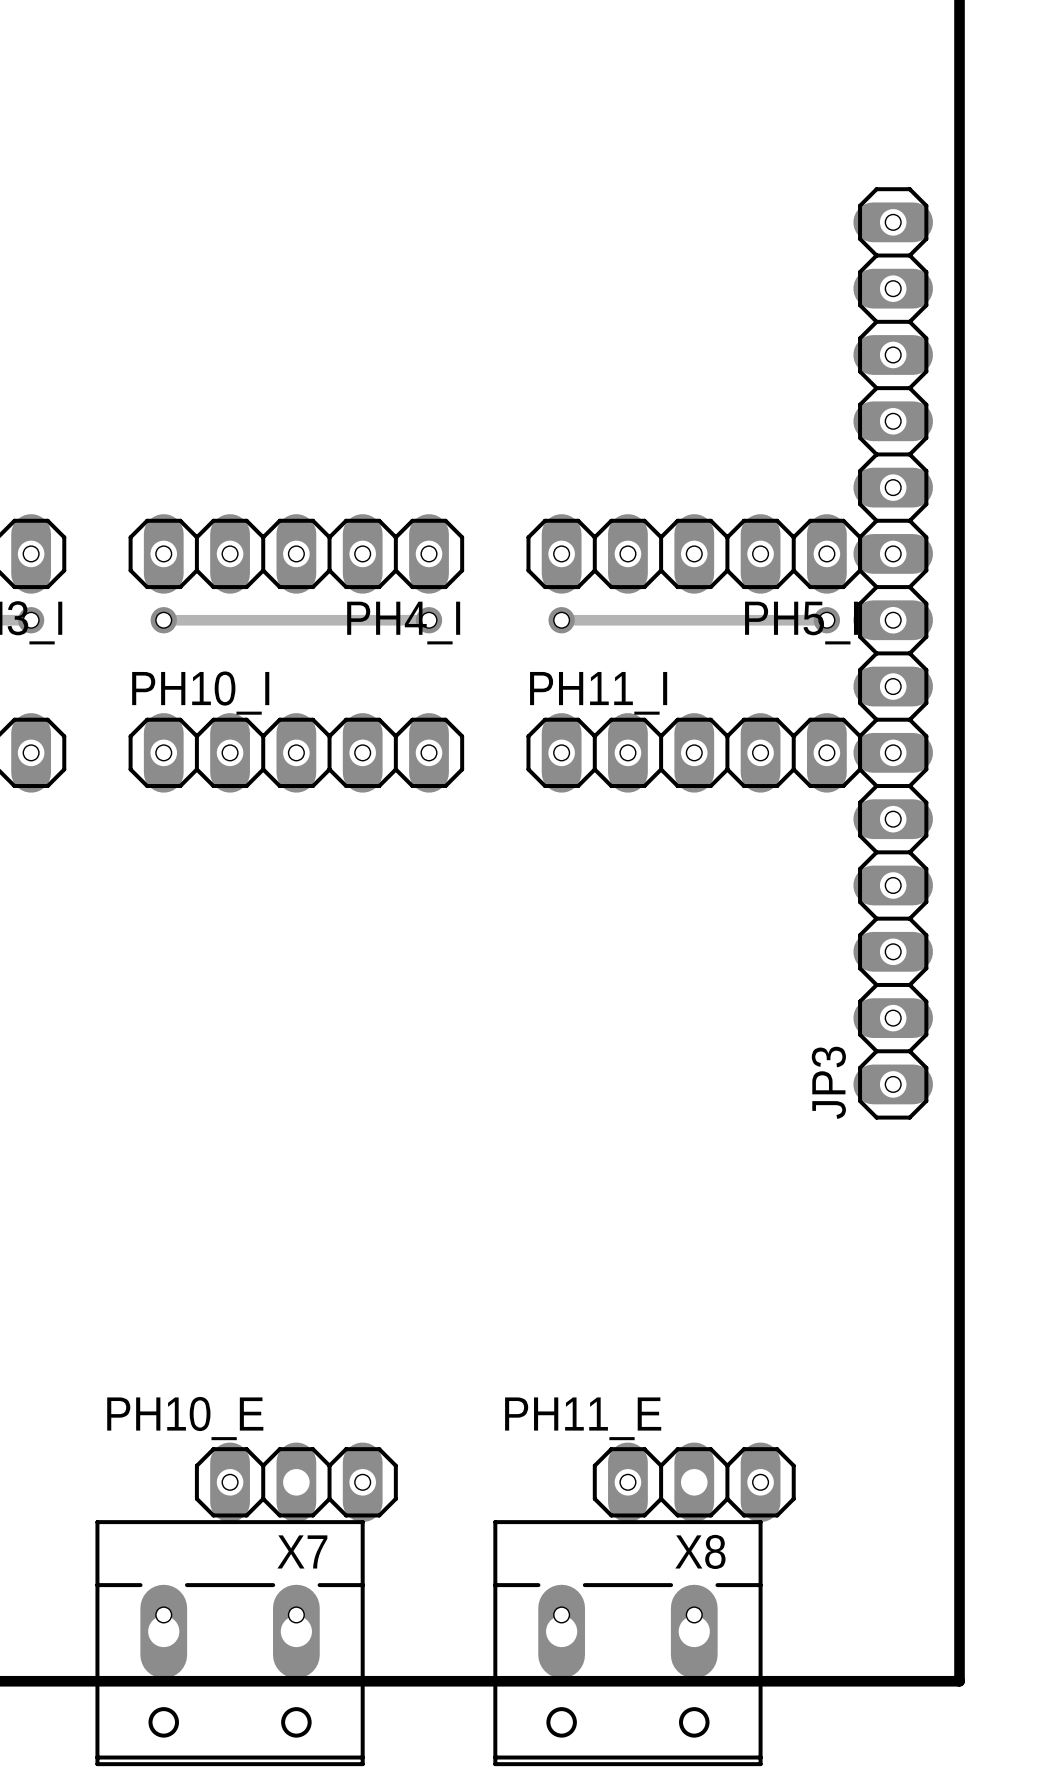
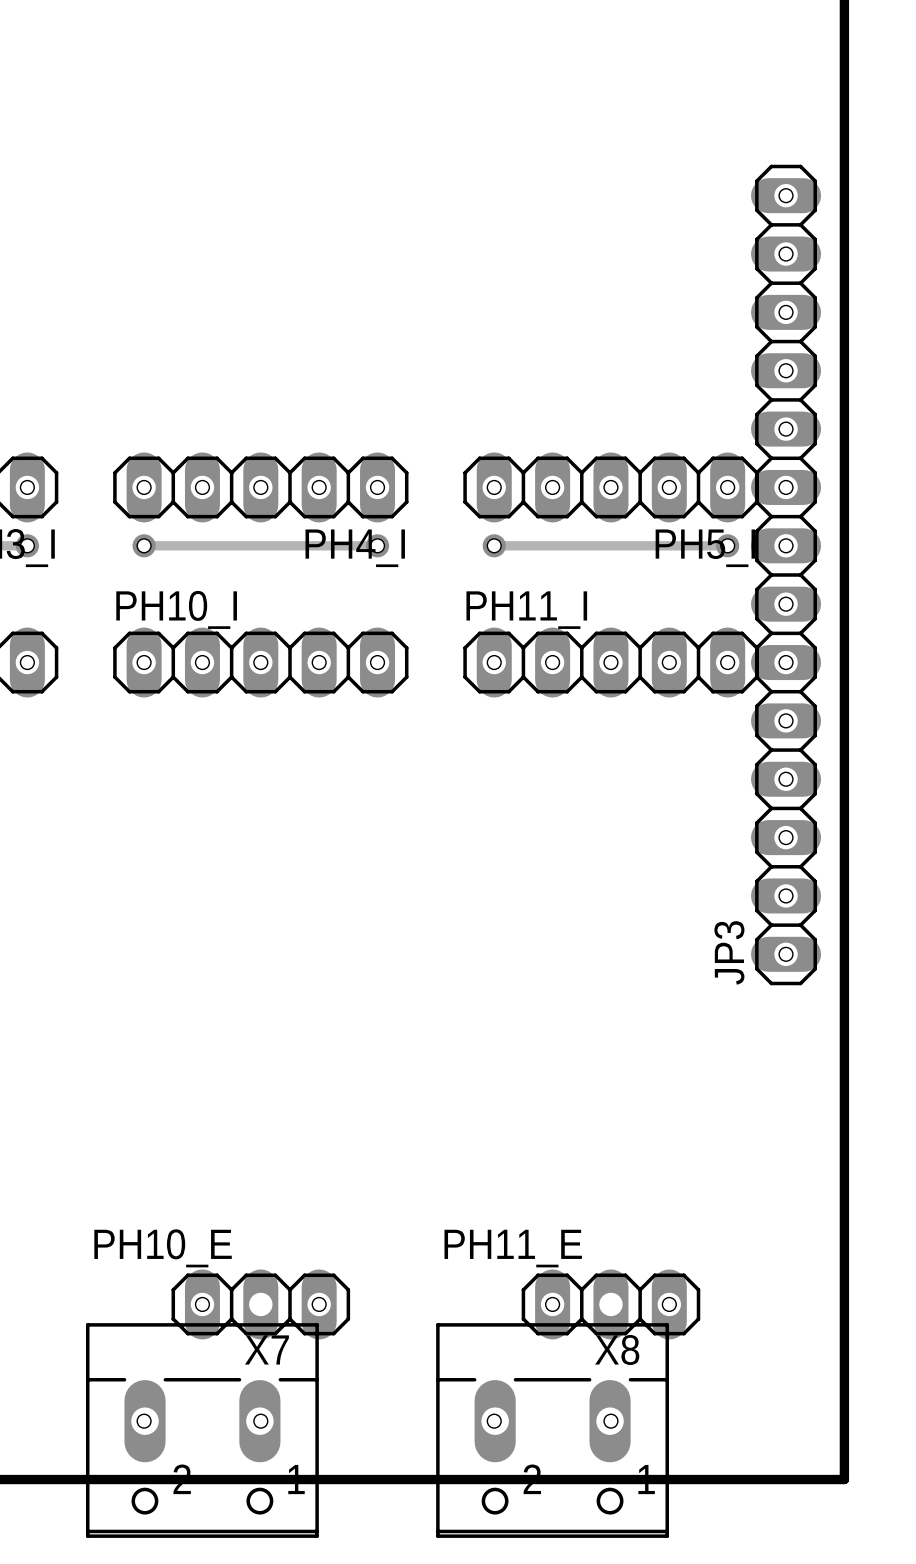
X7 footprint: [95, 1520, 365, 1767] -> [85, 1323, 319, 1538]
X8 footprint: [493, 1520, 763, 1767] -> [436, 1323, 669, 1538]

